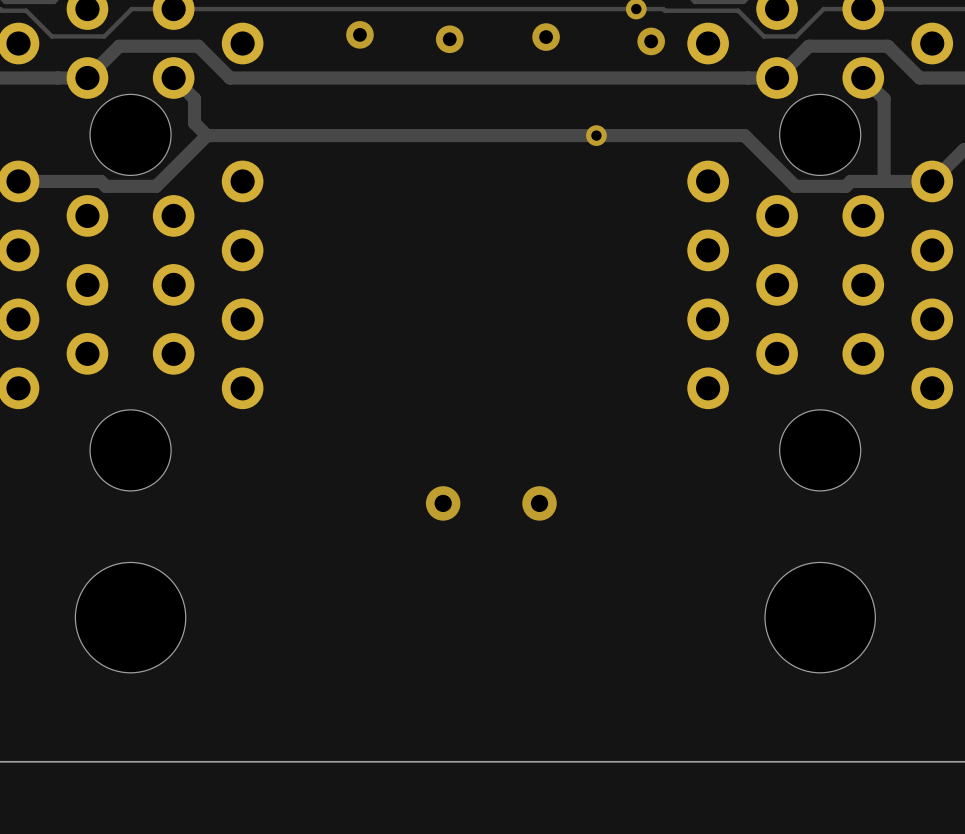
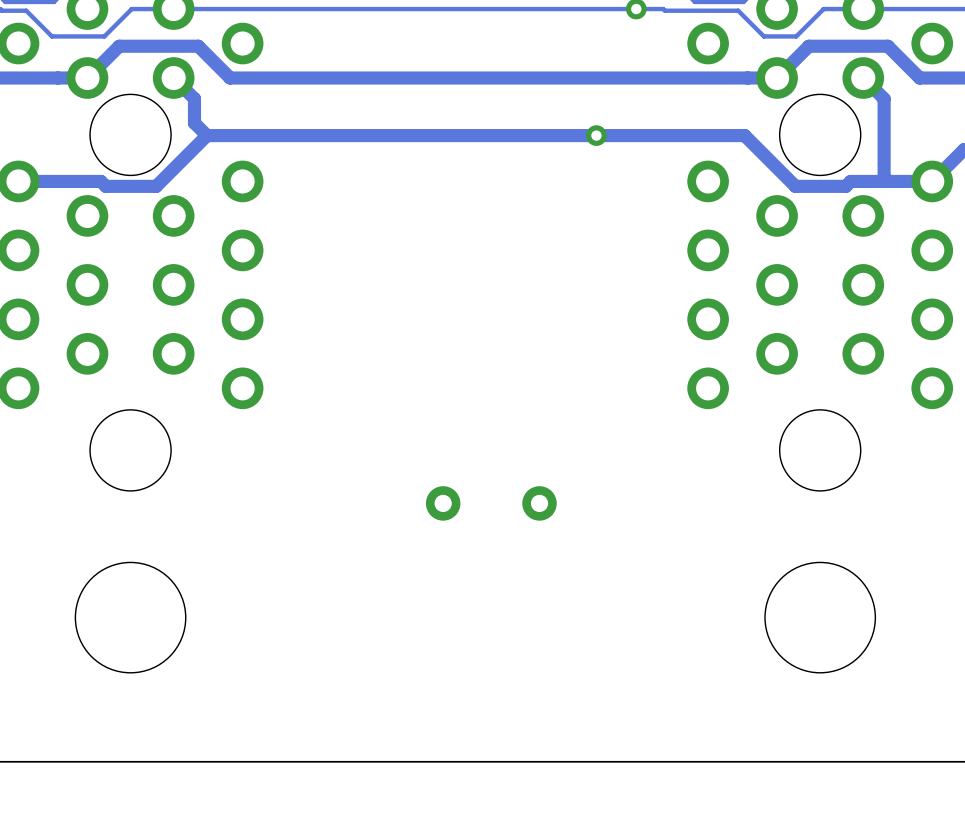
via: (359, 34) -> none
via: (546, 37) -> none
via: (449, 39) -> none
via: (651, 41) -> none

